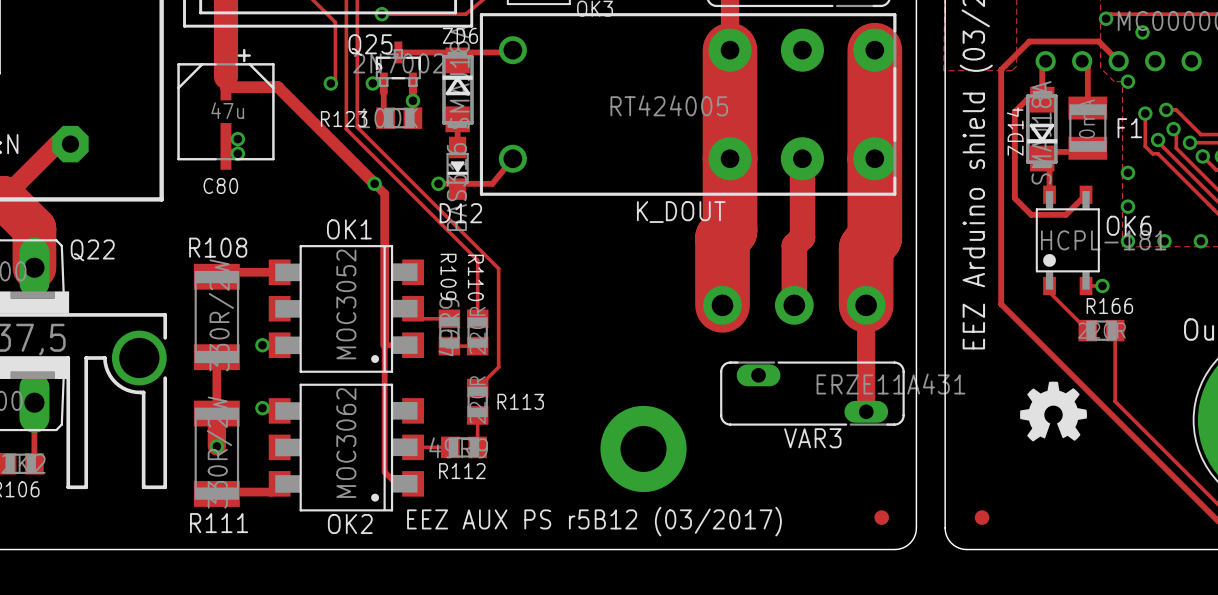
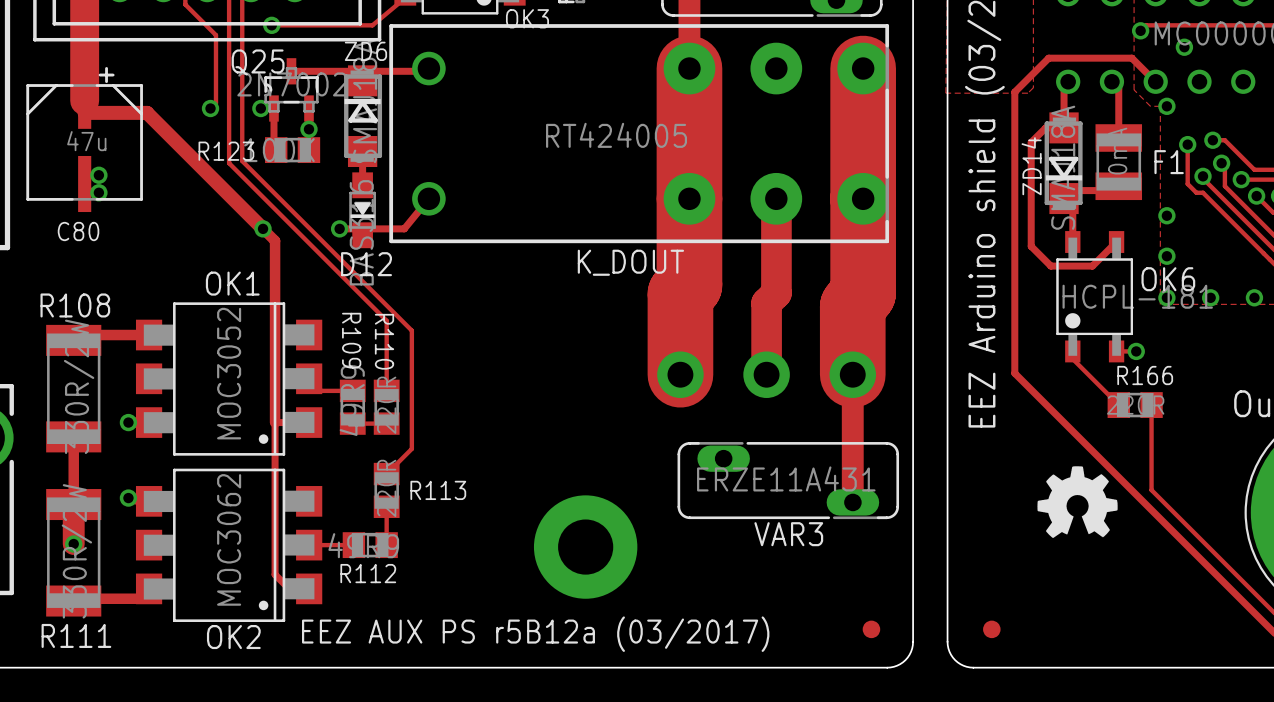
VAR3 value position: ERZE11A431 (891, 384) -> ERZE11A431 (786, 478)
text: EEZ AUX PS r5B12 (03/2017) (594, 521) -> EEZ AUX PS r5B12a (03/2017) (535, 634)

